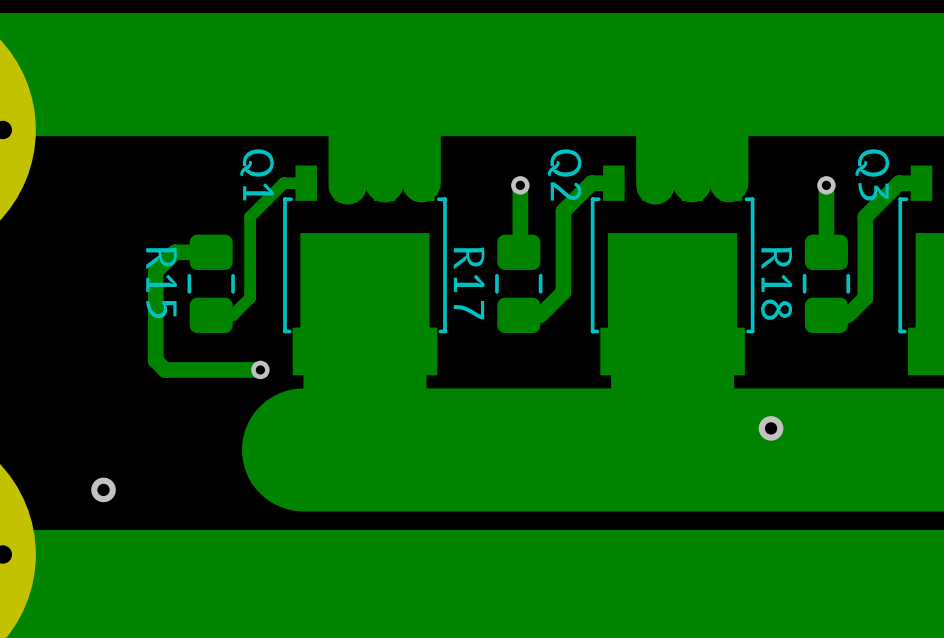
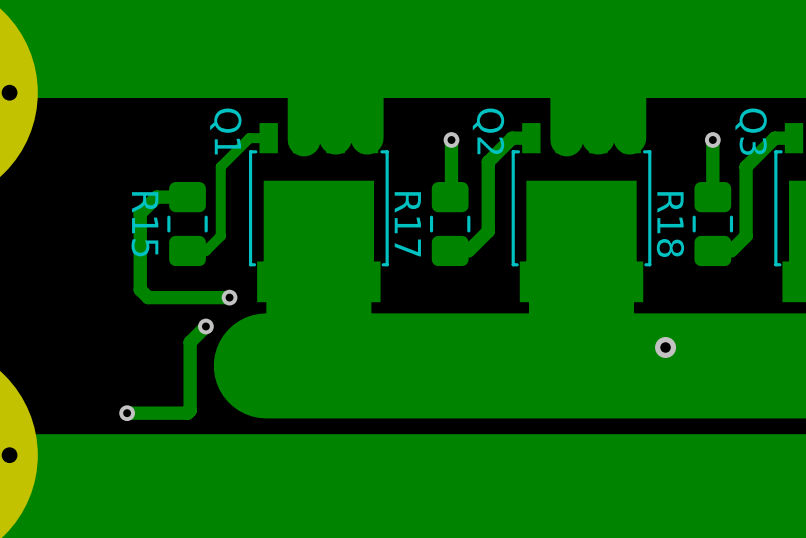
track: none -> (205, 326) (190, 342) (190, 410) (187, 413) (127, 413)
via: none -> (205, 326)
via: (103, 489) -> none
via: none -> (127, 413)

